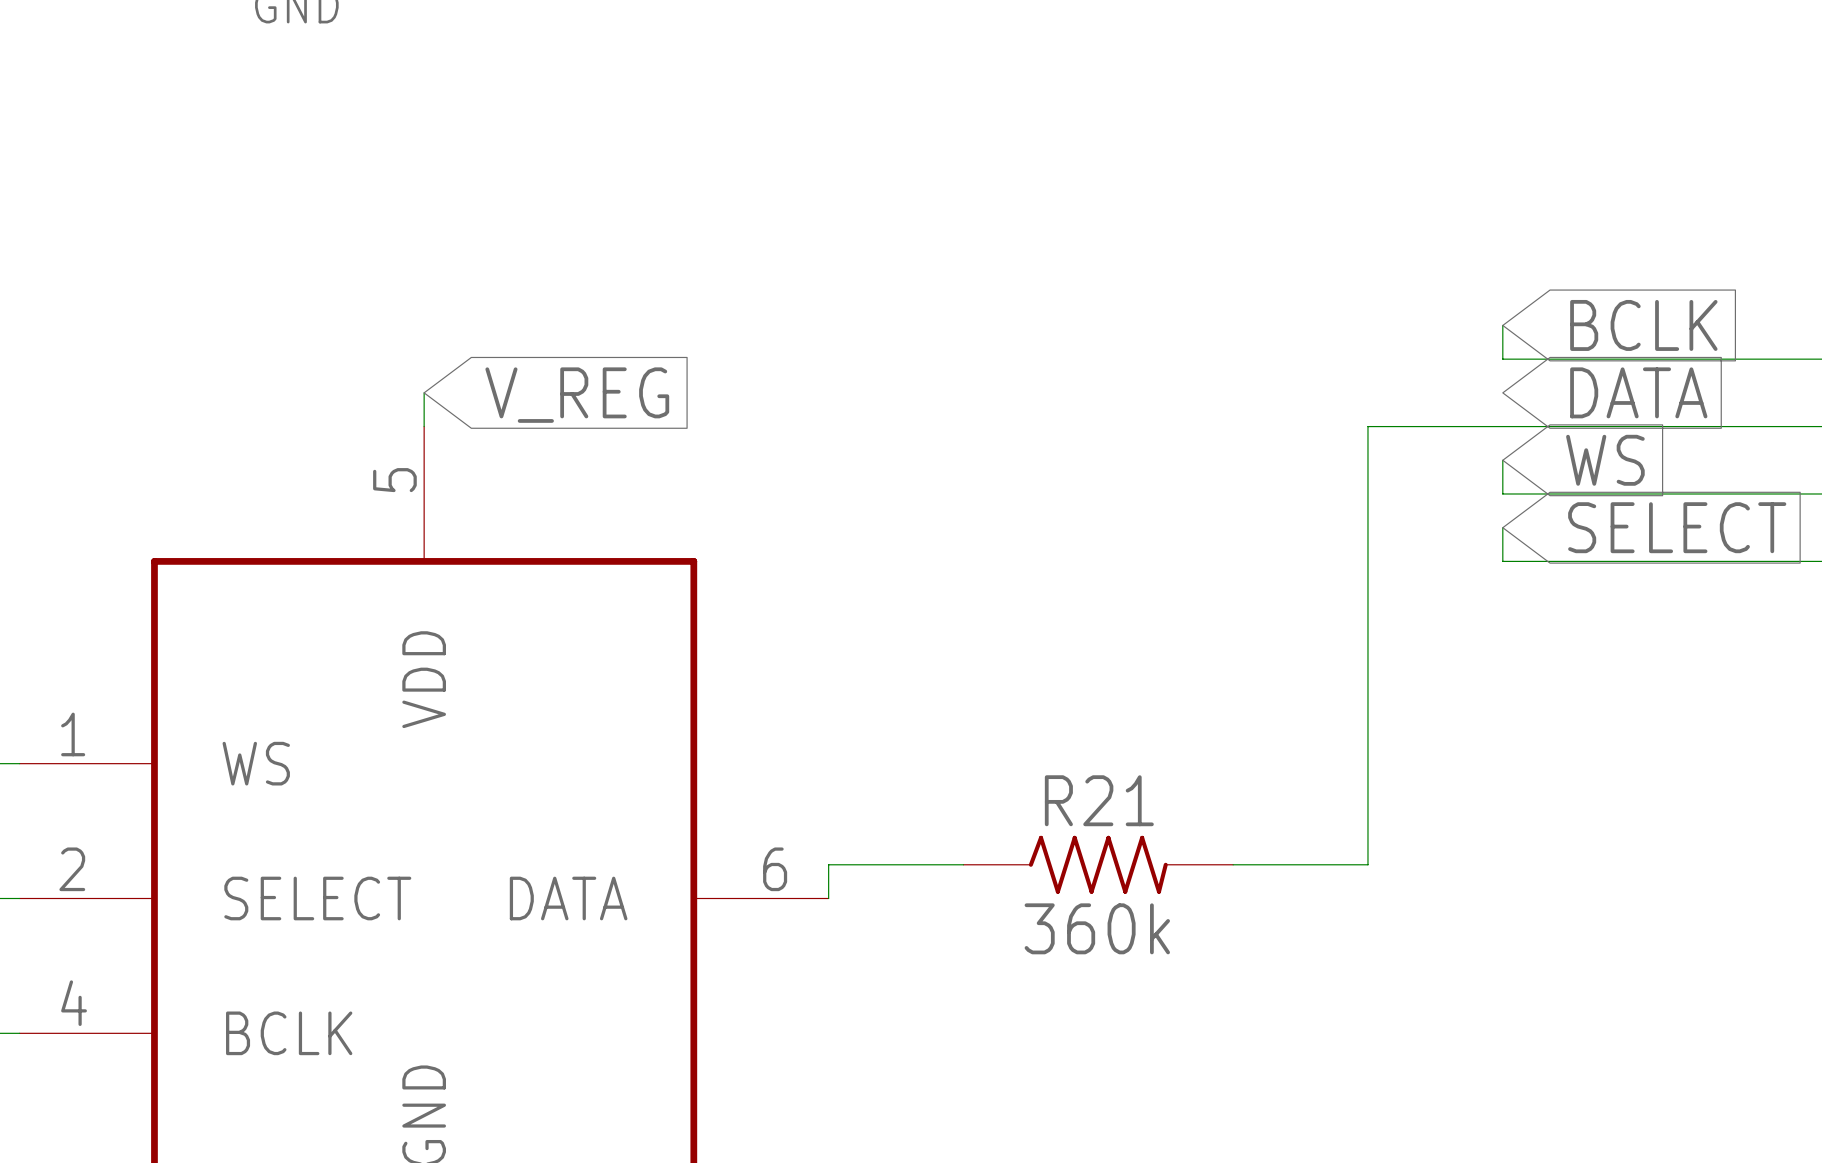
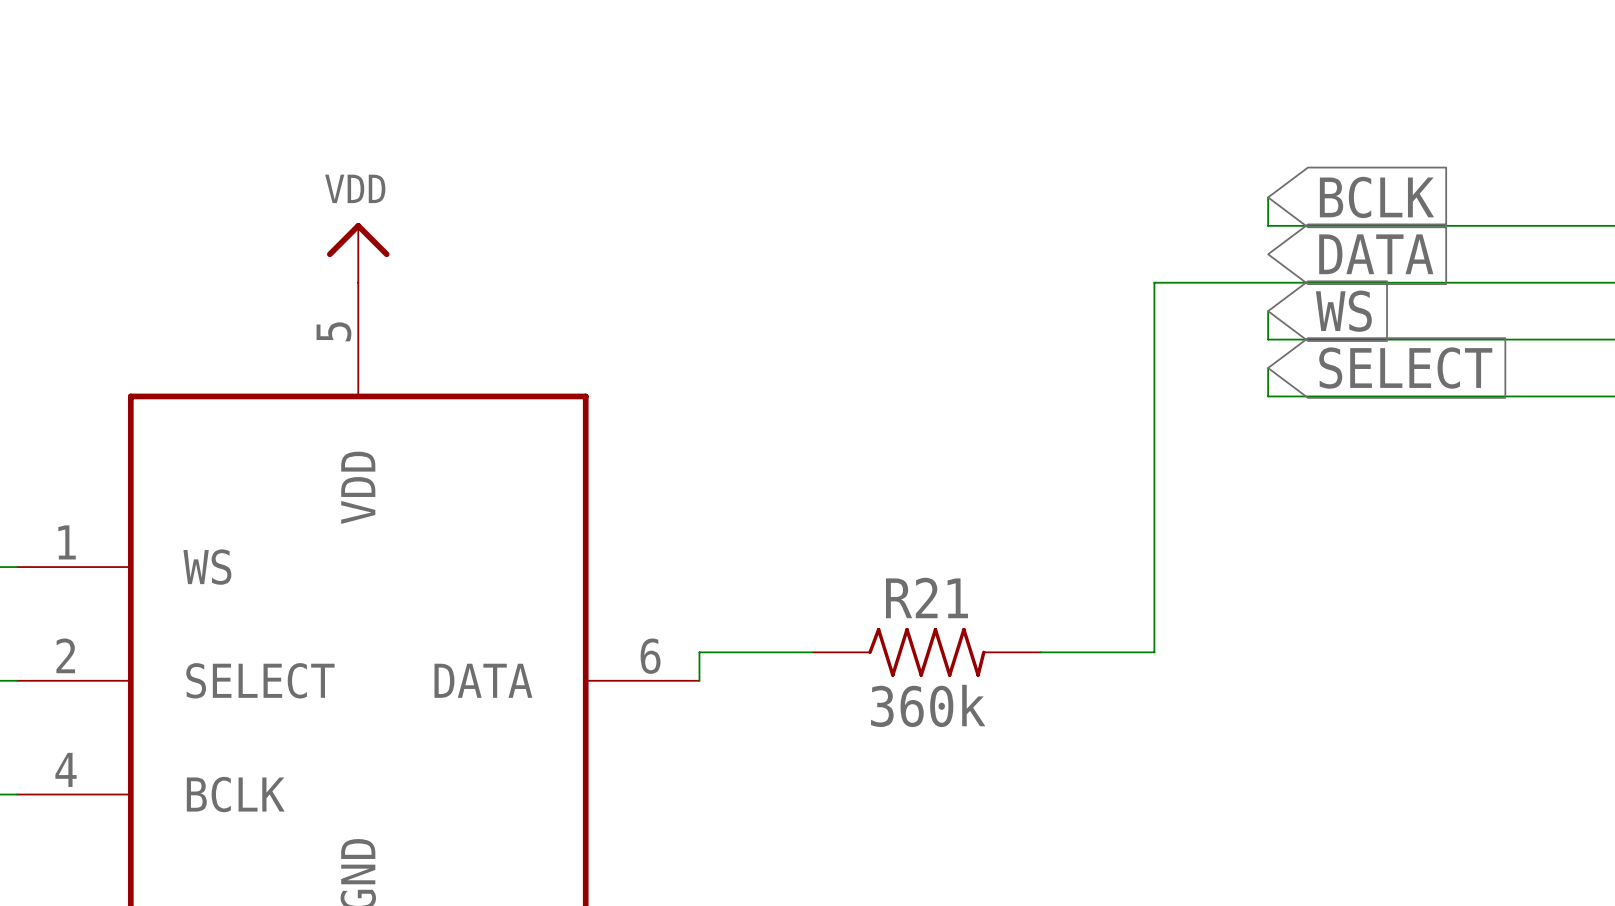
power symbol: none -> VDD (358, 252)
global label: V_REG (577, 395) -> none

